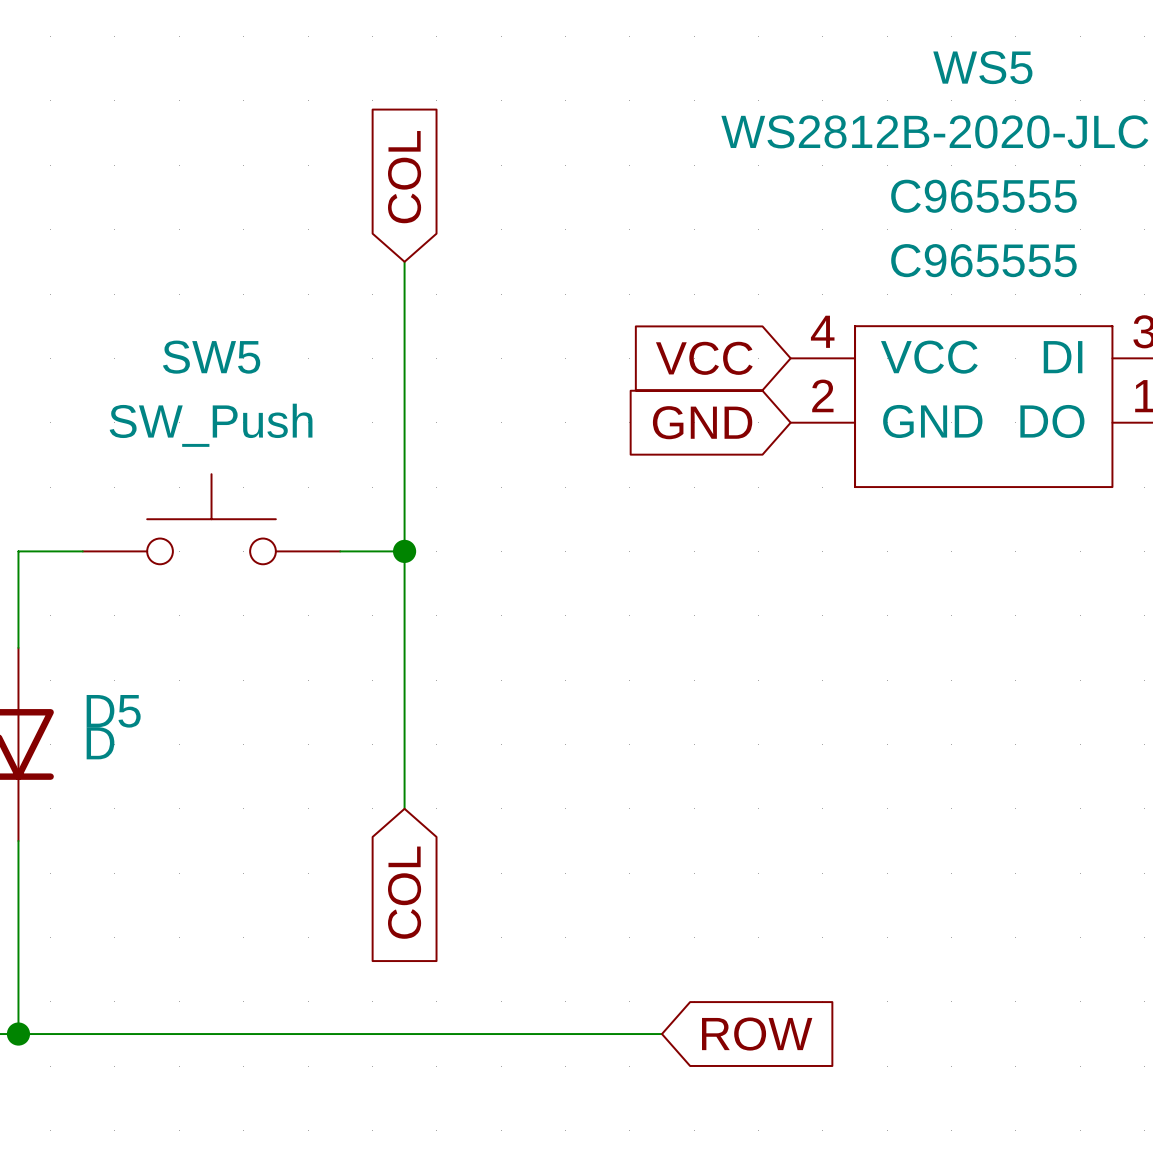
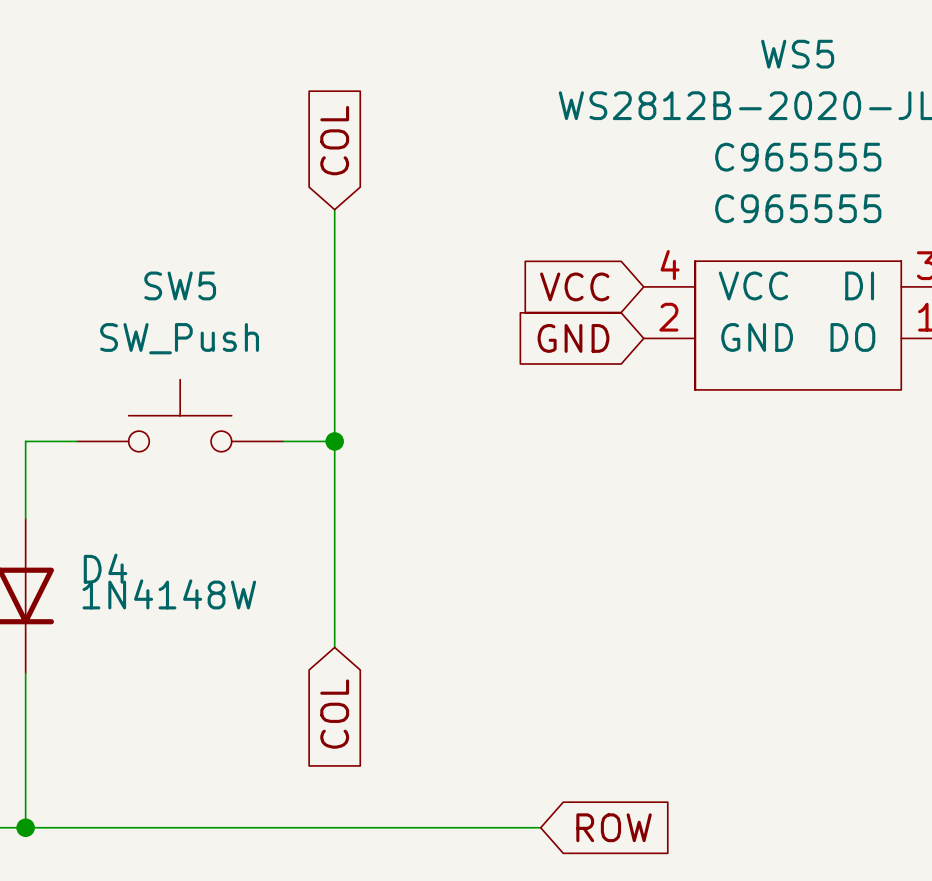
D5 name: D5 (113, 711) -> D4 (105, 568)
D5 value: D (100, 743) -> 1N4148W (169, 594)

